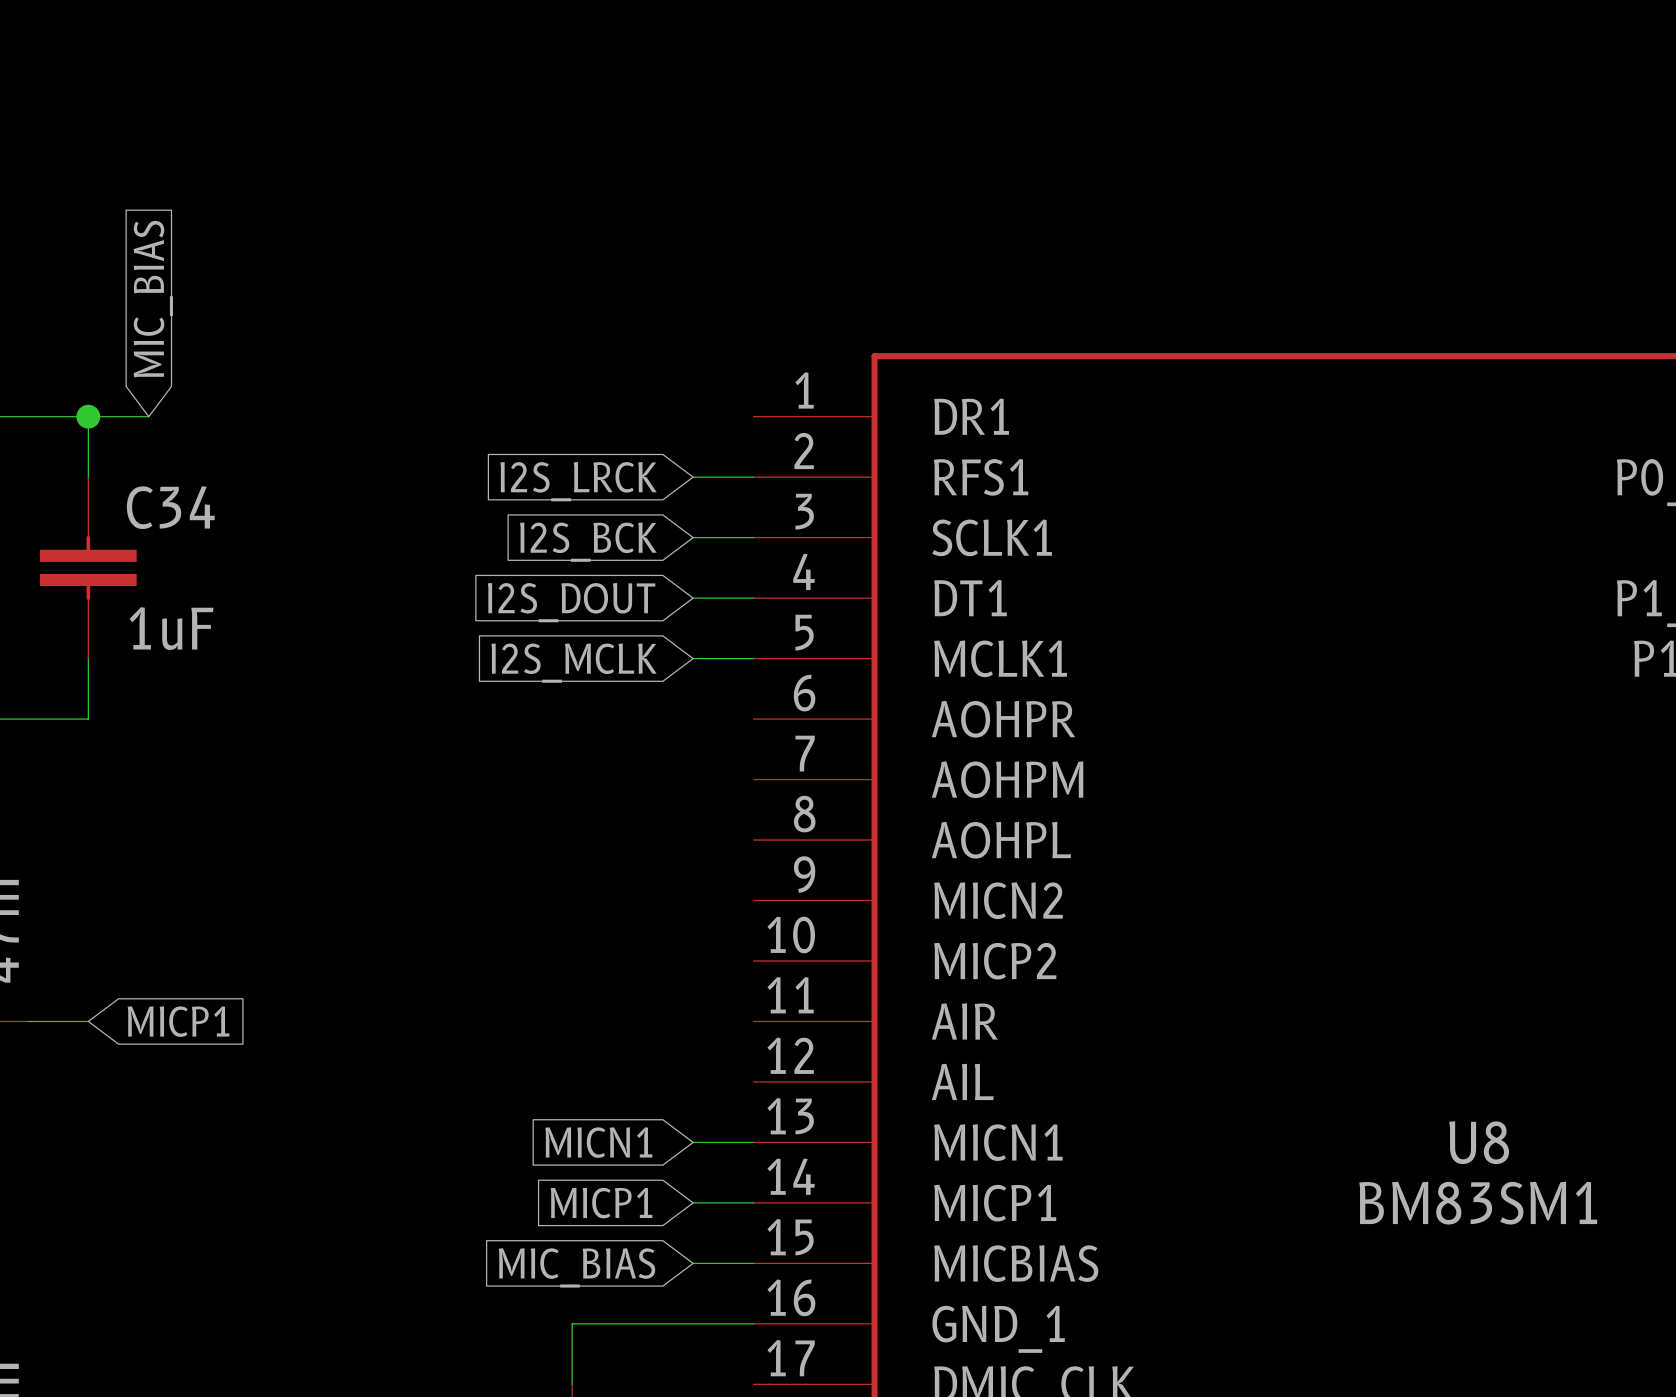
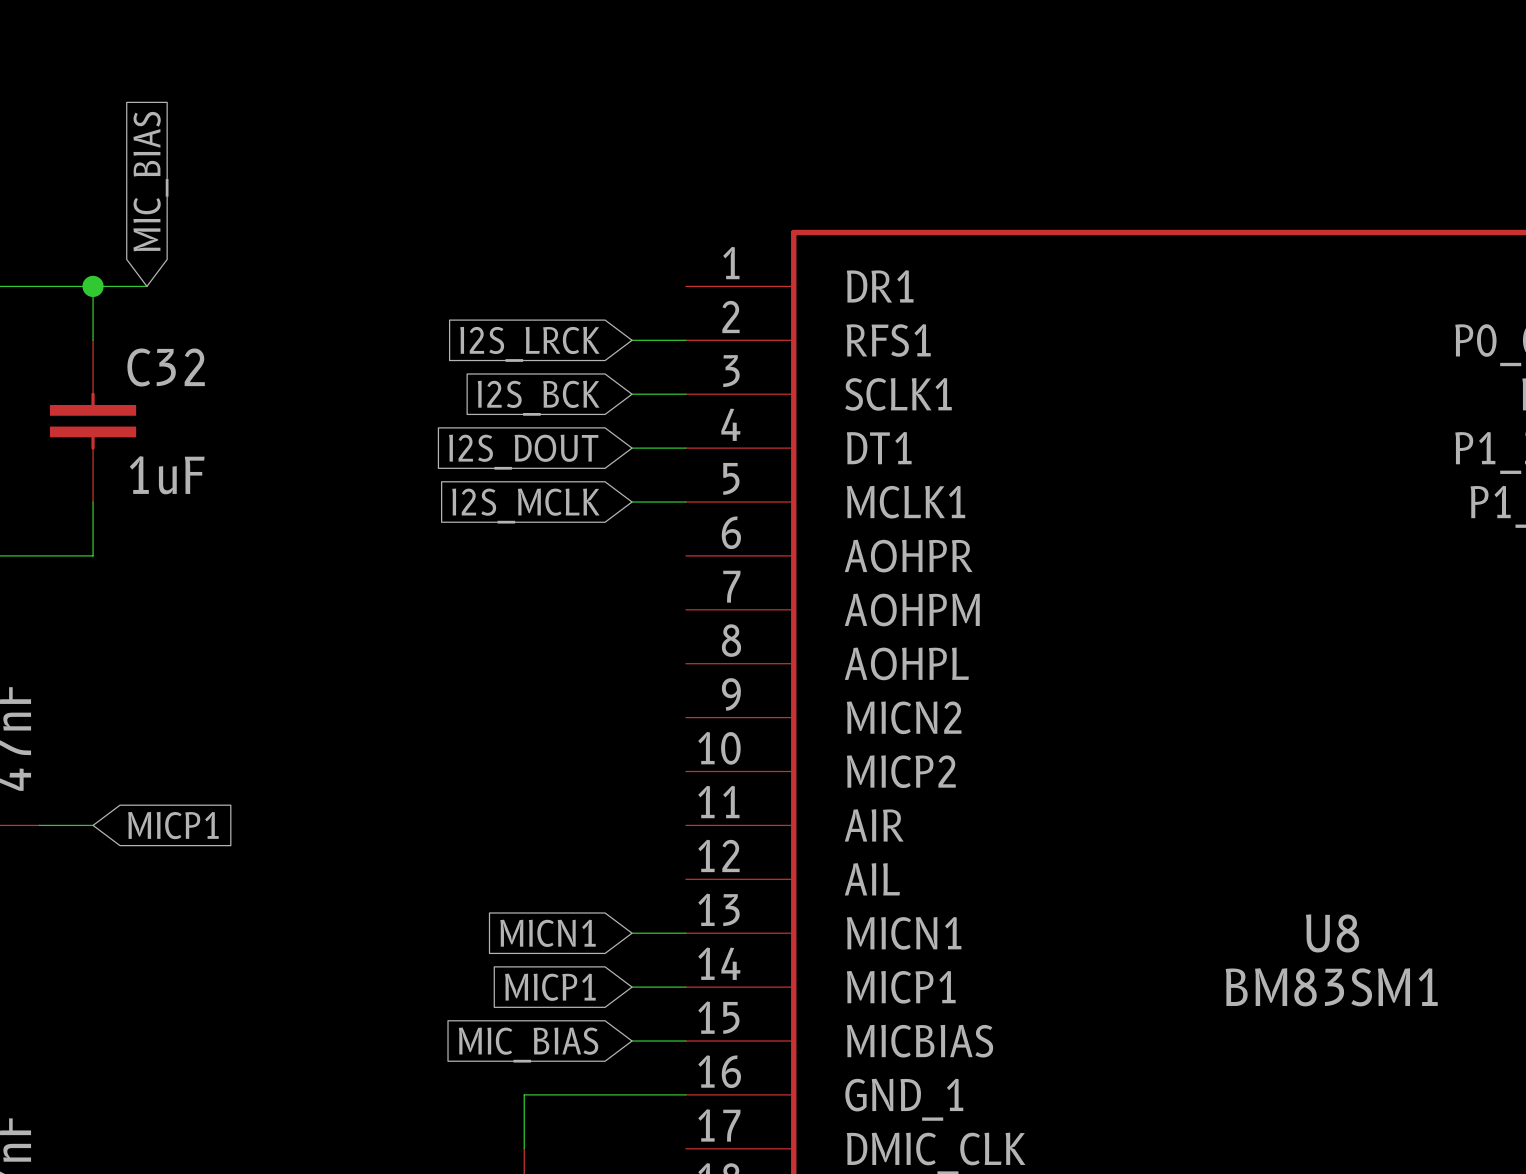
C34 name: C34 (170, 507) -> C32 (166, 367)

